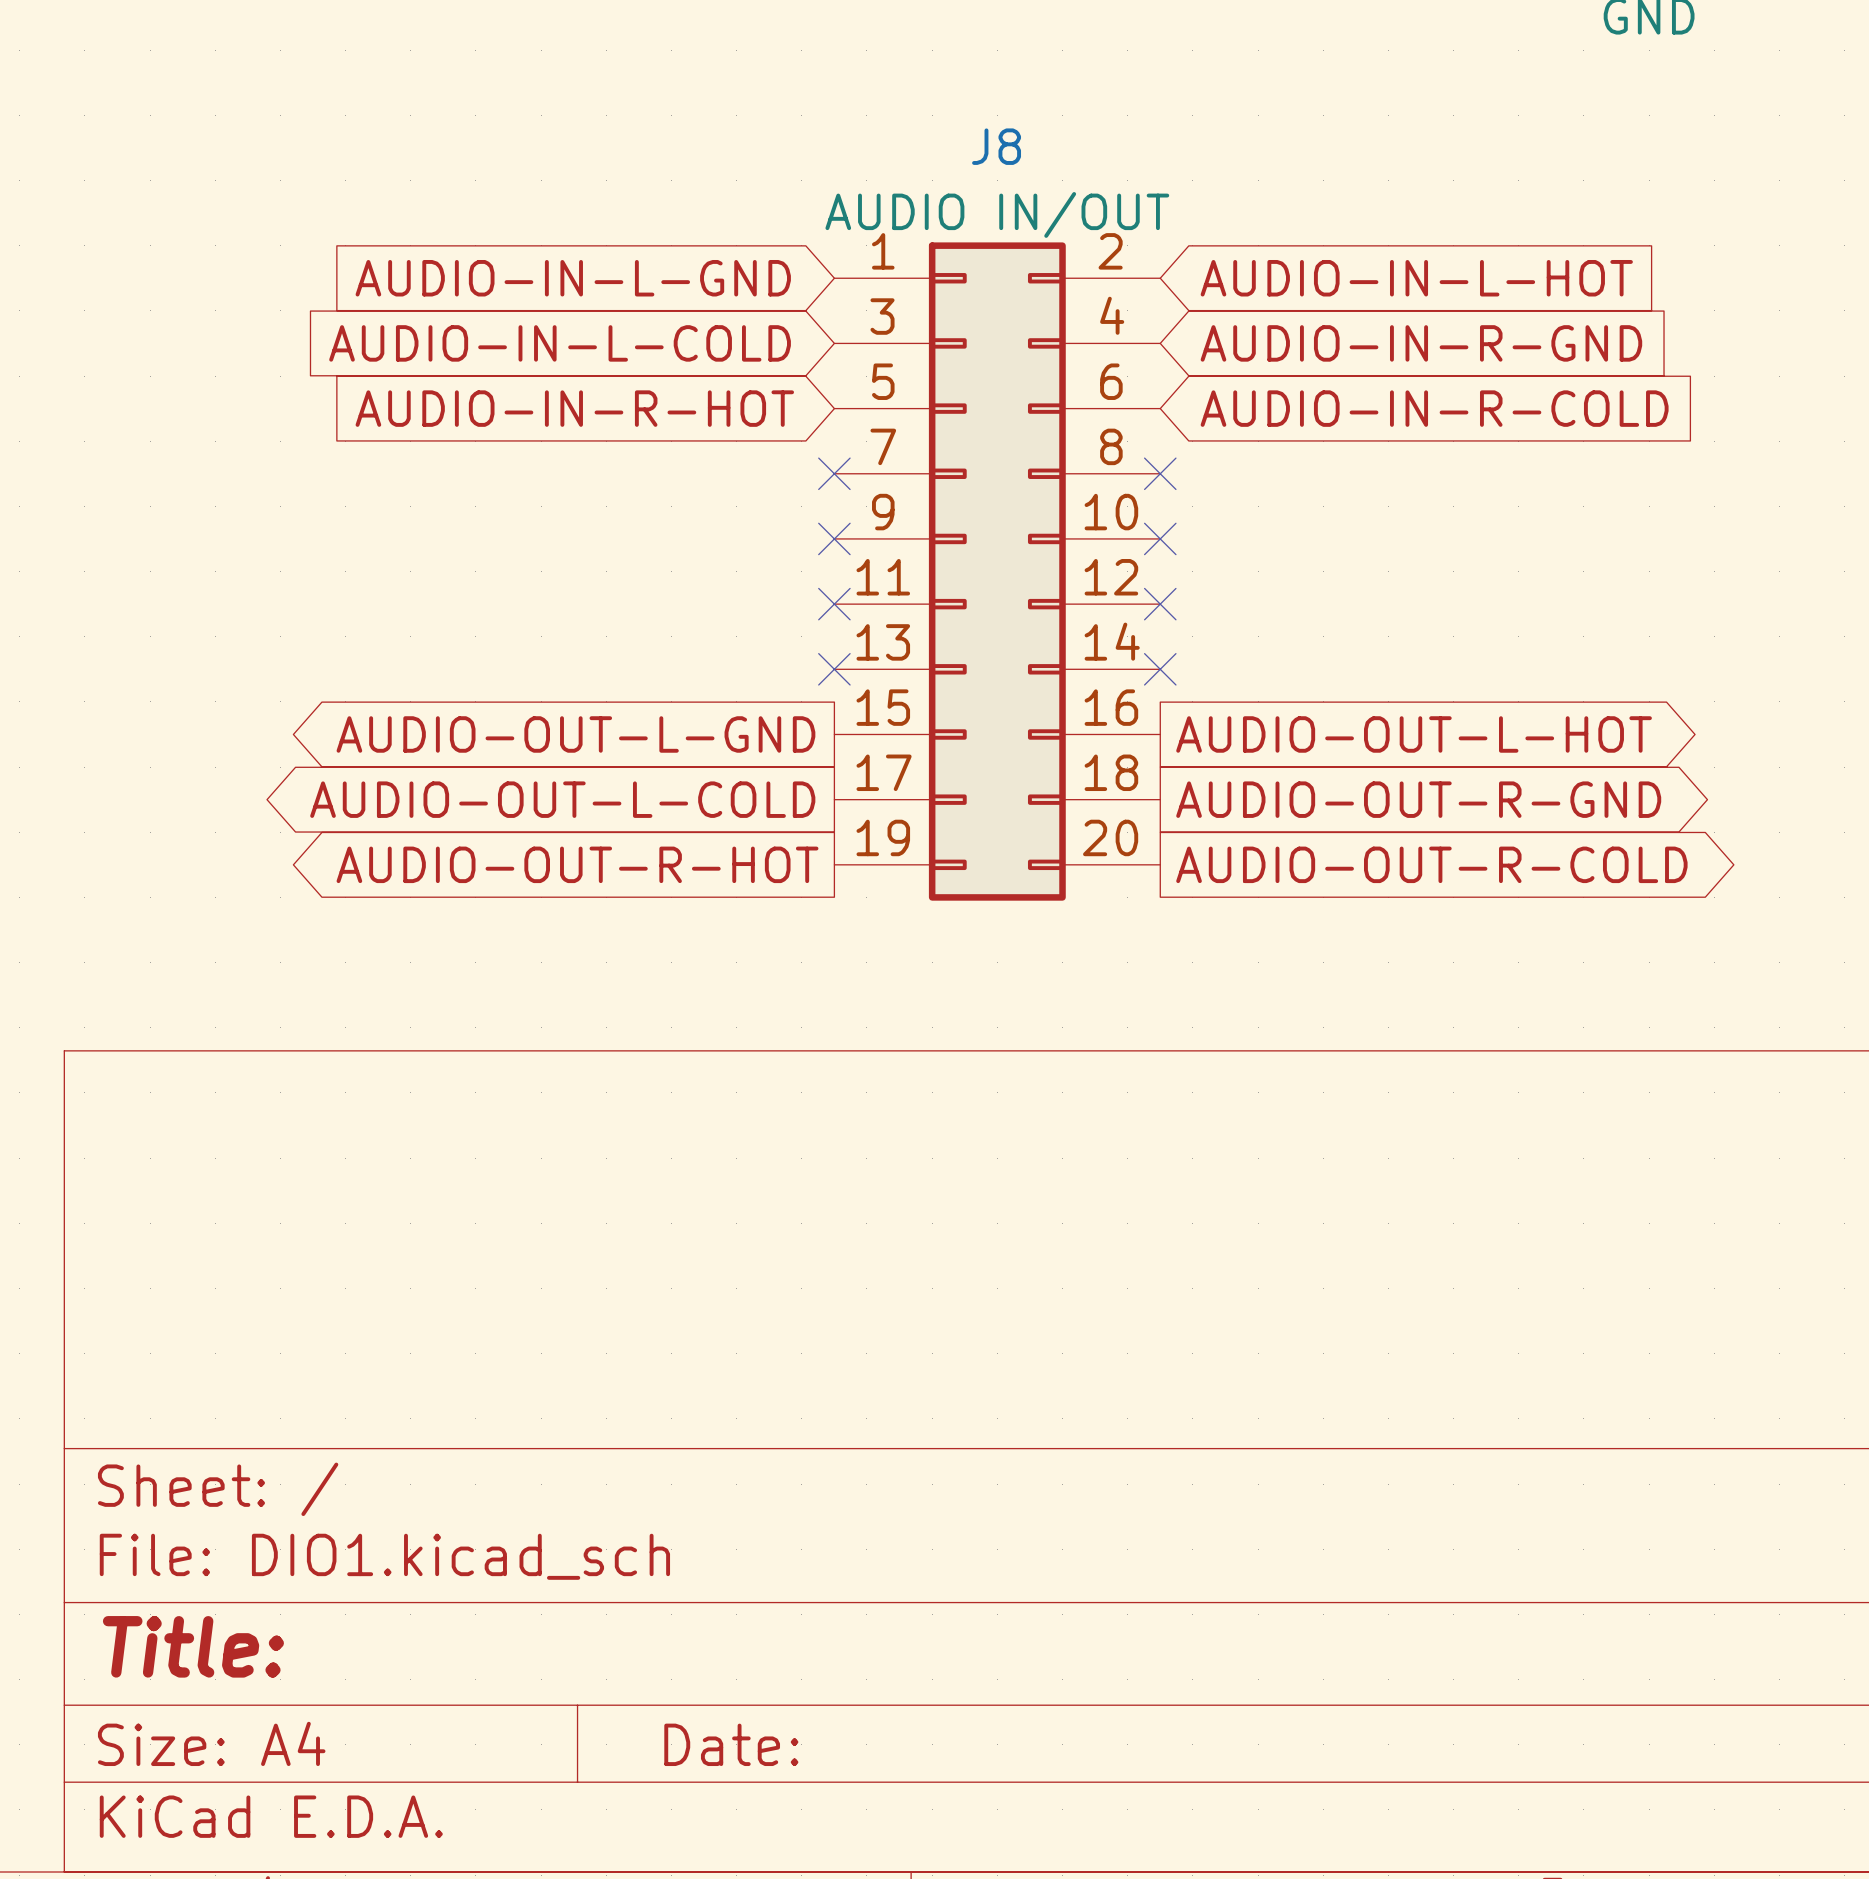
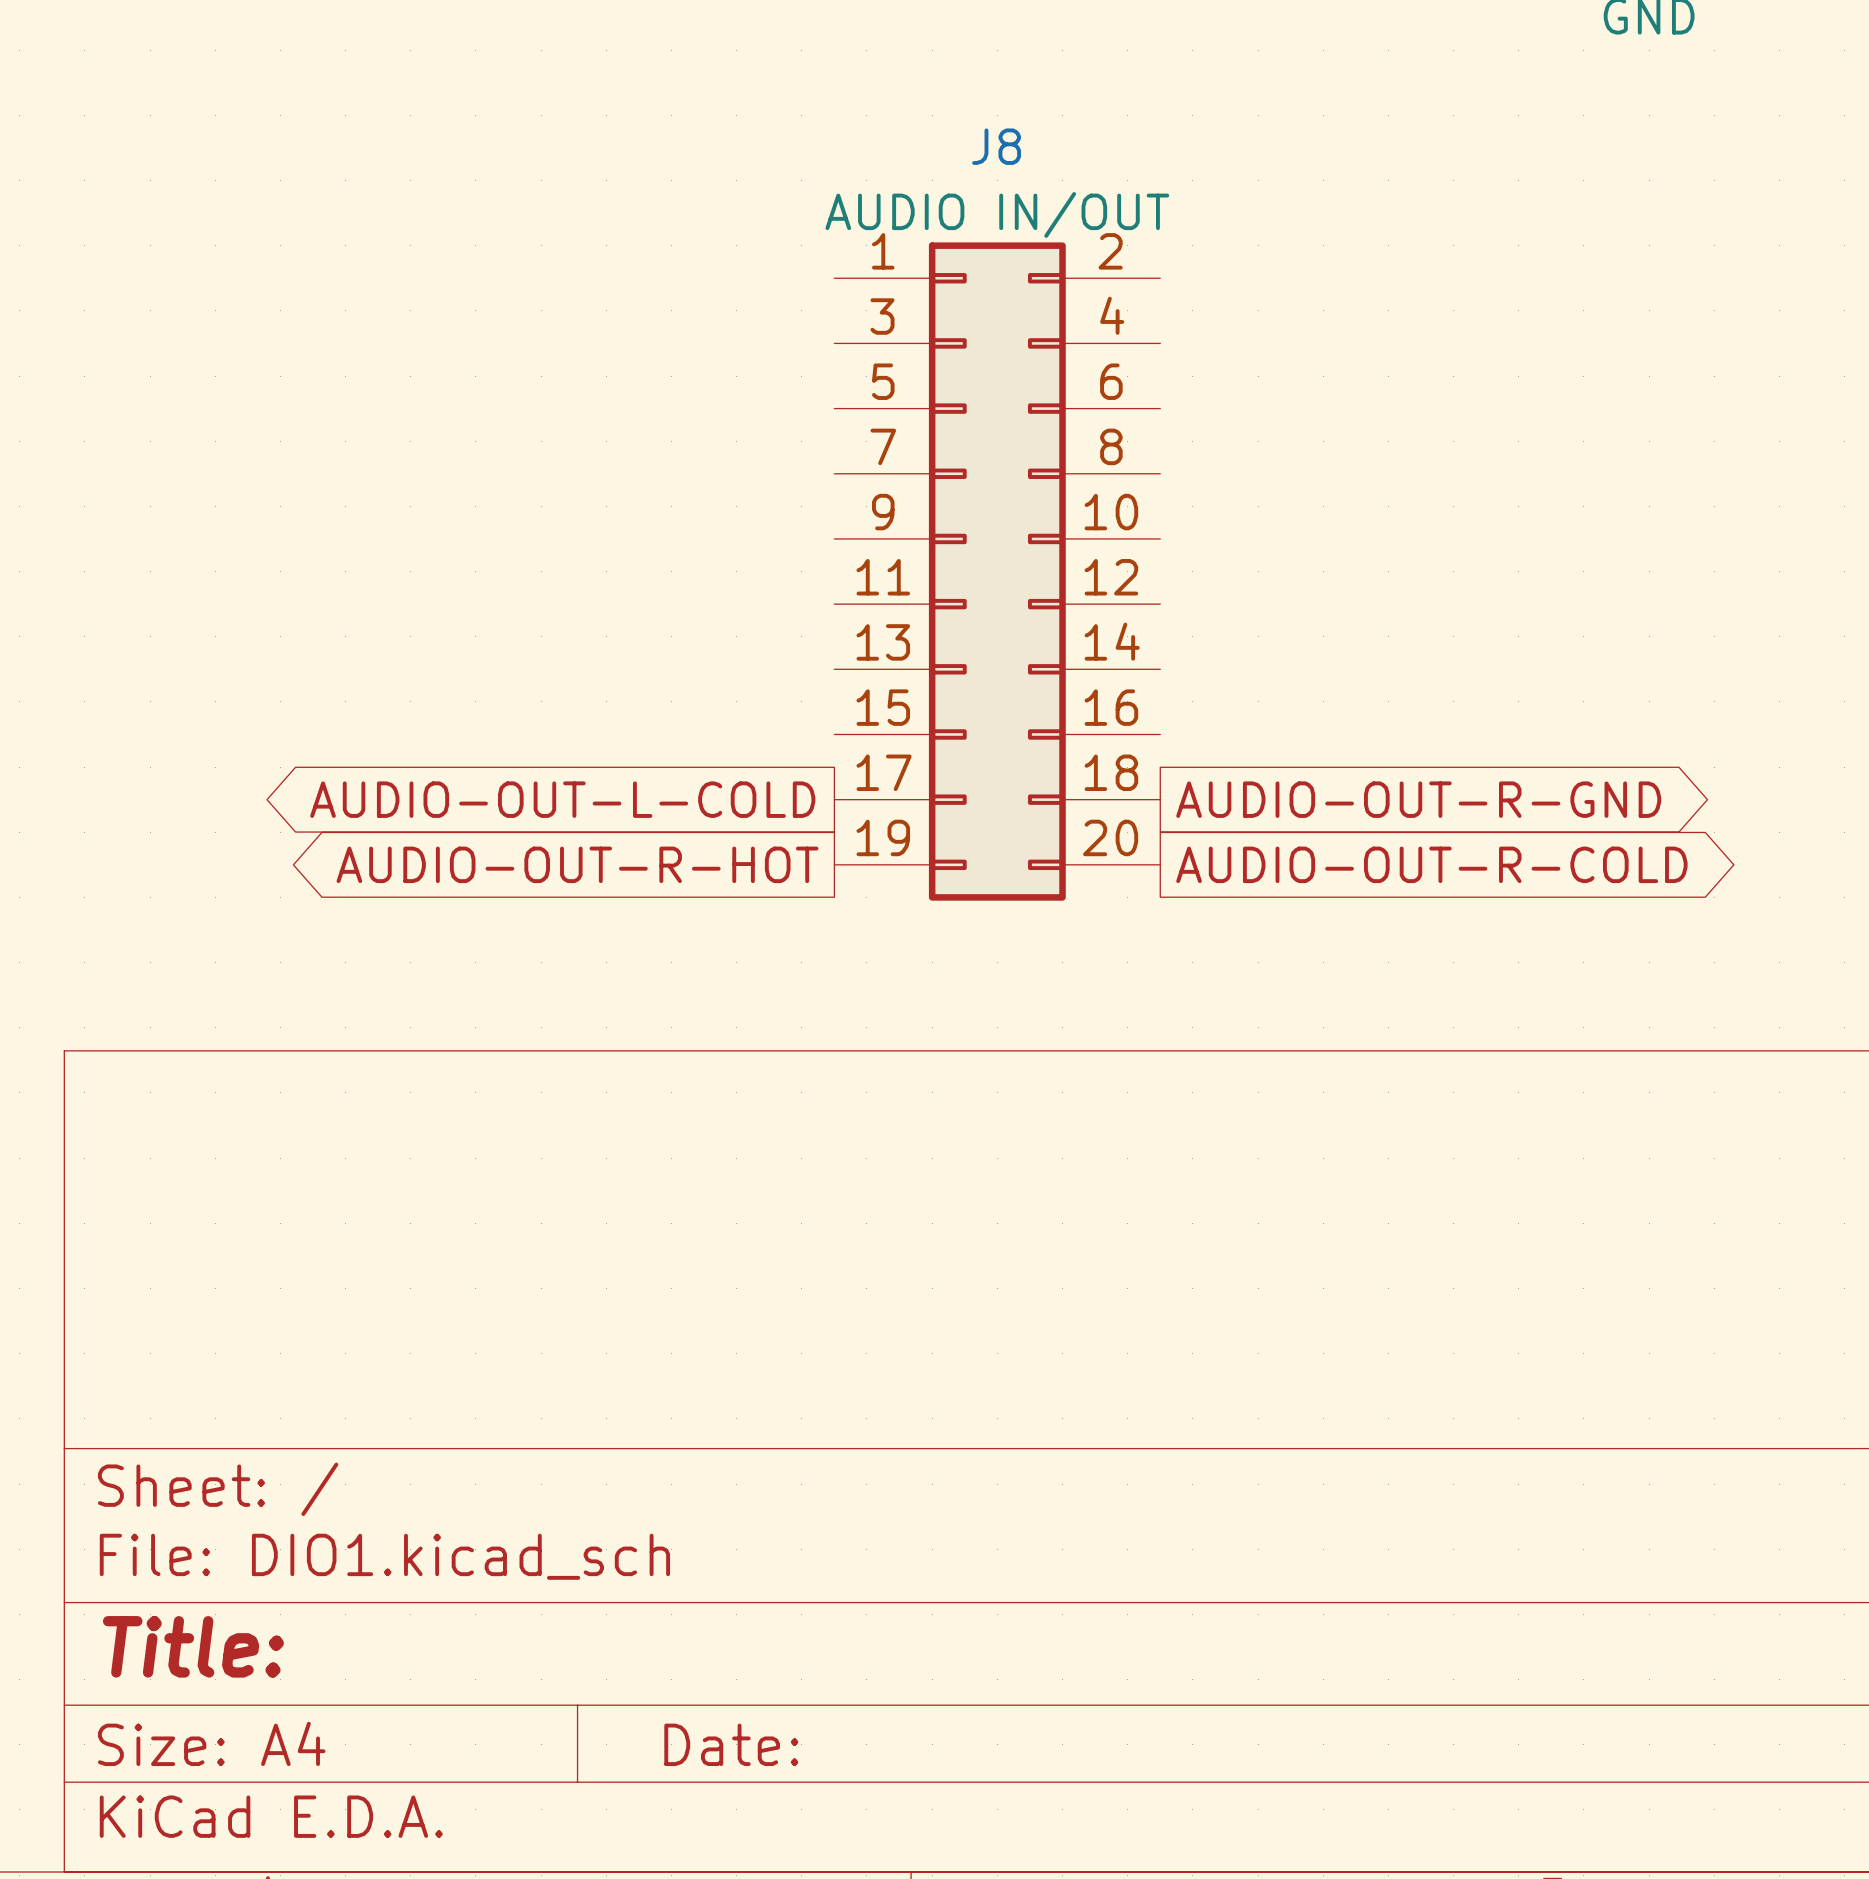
global label: AUDIO-IN-L-GND (573, 278) -> none
global label: AUDIO-IN-L-HOT (1416, 278) -> none
global label: AUDIO-IN-L-COLD (560, 343) -> none
global label: AUDIO-IN-R-GND (1421, 343) -> none
global label: AUDIO-IN-R-HOT (574, 408) -> none
global label: AUDIO-IN-R-COLD (1434, 408) -> none
no-connect mark: (834, 473) -> none
no-connect mark: (1160, 473) -> none
no-connect mark: (834, 538) -> none
no-connect mark: (1160, 538) -> none
no-connect mark: (834, 604) -> none
no-connect mark: (1160, 604) -> none
no-connect mark: (834, 669) -> none
no-connect mark: (1160, 669) -> none
global label: AUDIO-OUT-L-GND (575, 734) -> none
global label: AUDIO-OUT-L-HOT (1414, 734) -> none

